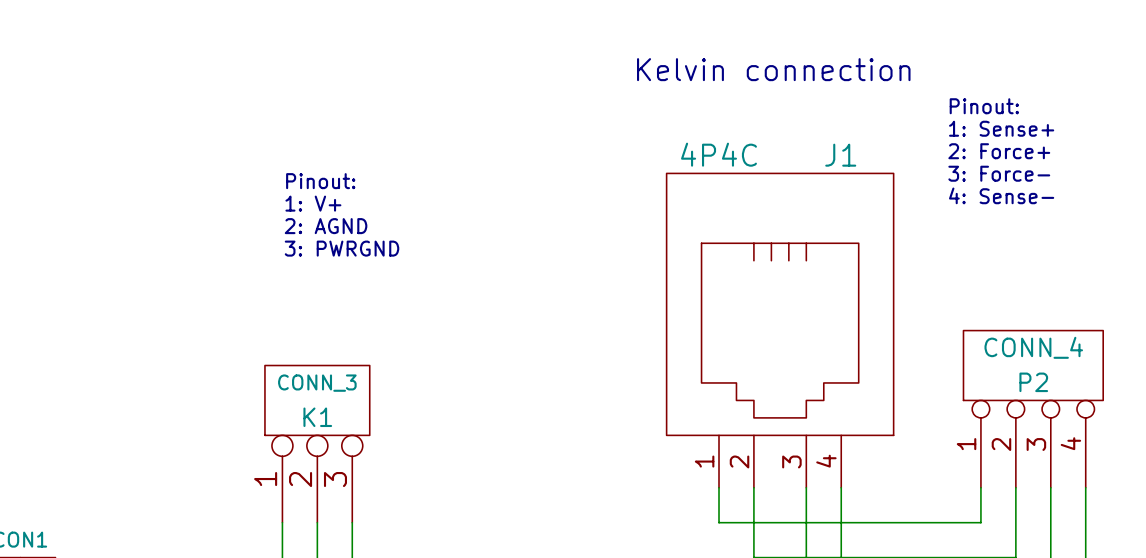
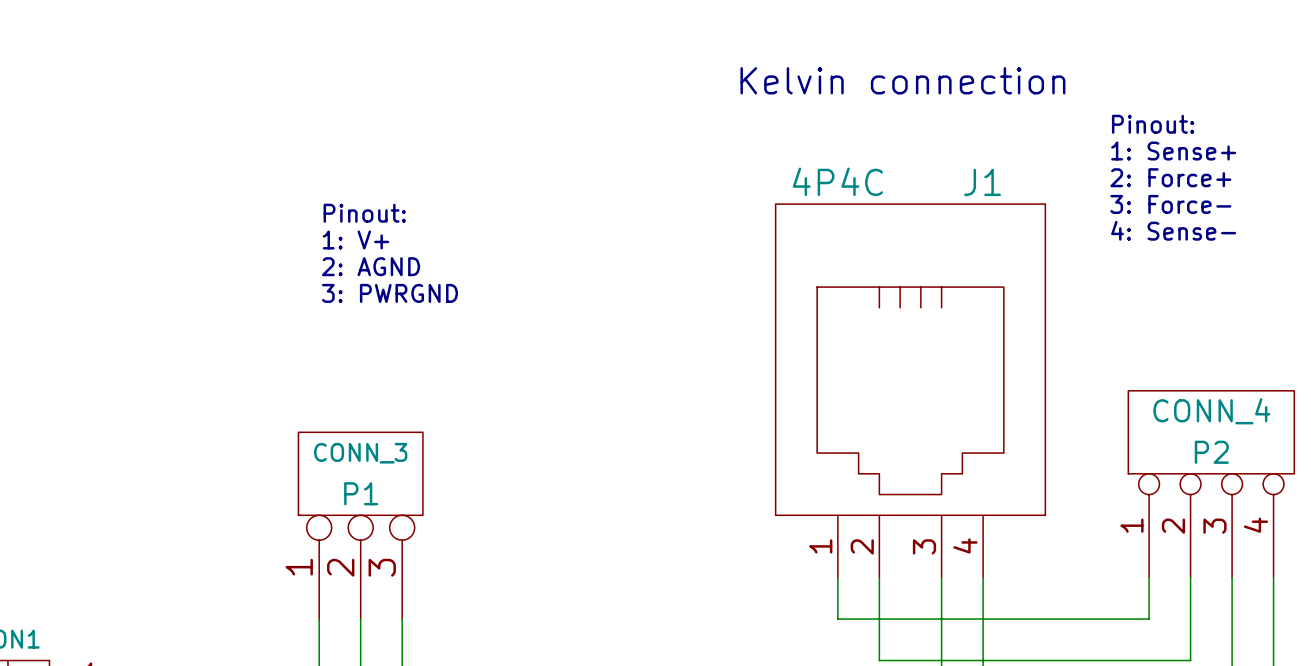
K1 name: K1 (317, 417) -> P1 (361, 493)

